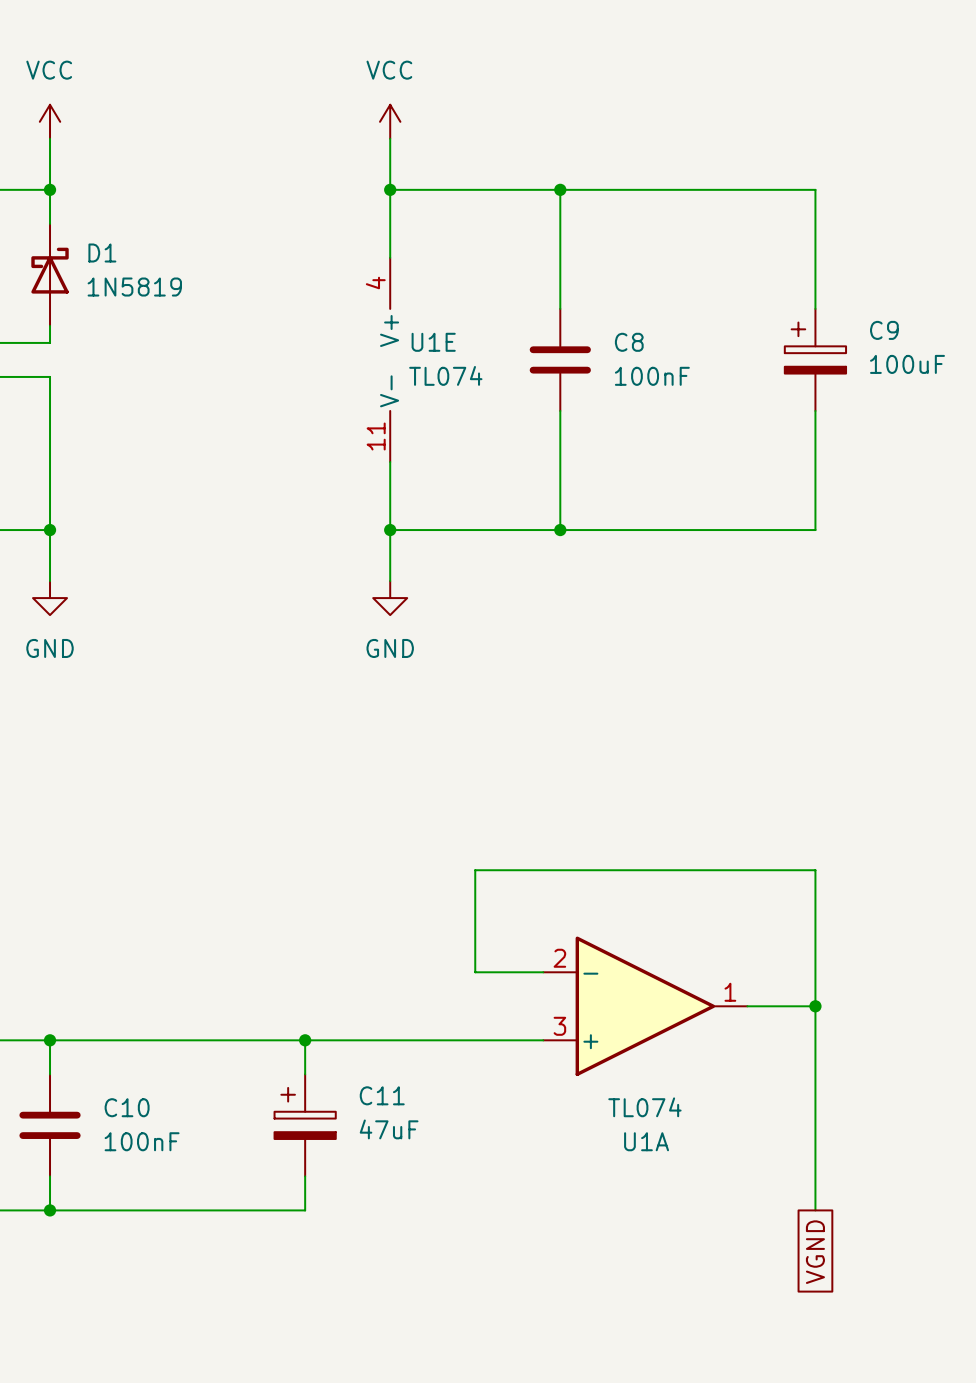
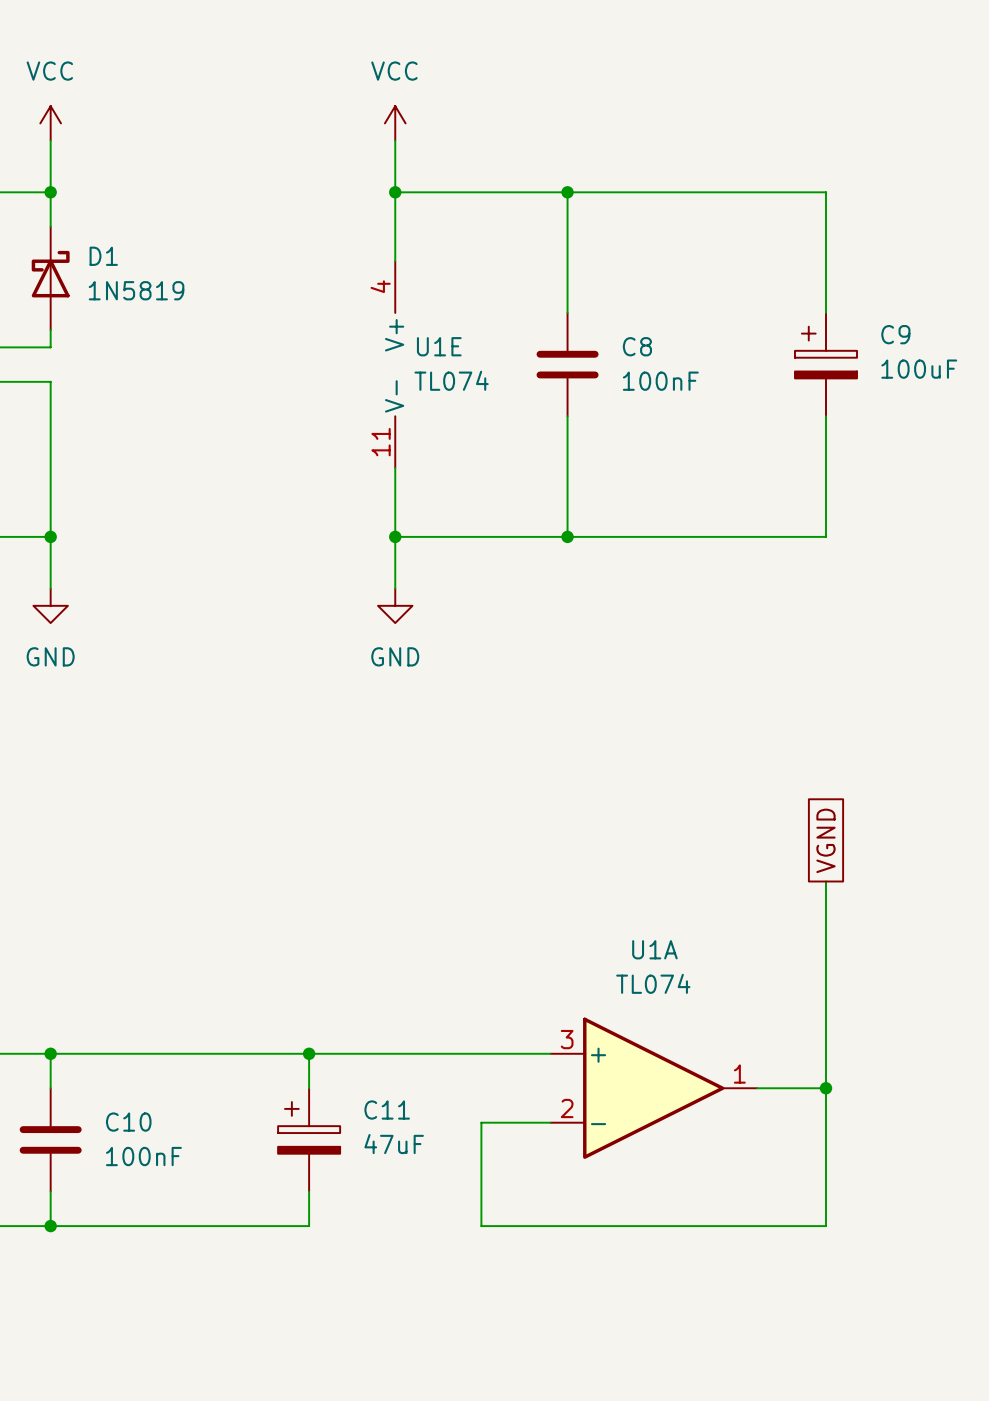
global label: none -> VGND (825, 840)
wire: (815, 870) (475, 870) (475, 972) (543, 972) -> none
U1A flip: as is (645, 1006) -> up-down (653, 1088)
wire: (747, 1006) (815, 1006) -> (757, 1088) (825, 1088)
junction position: (815, 1006) -> (825, 1088)
wire: none -> (550, 1122) (481, 1122) (481, 1226) (825, 1226)
global label: VGND (815, 1252) -> none

